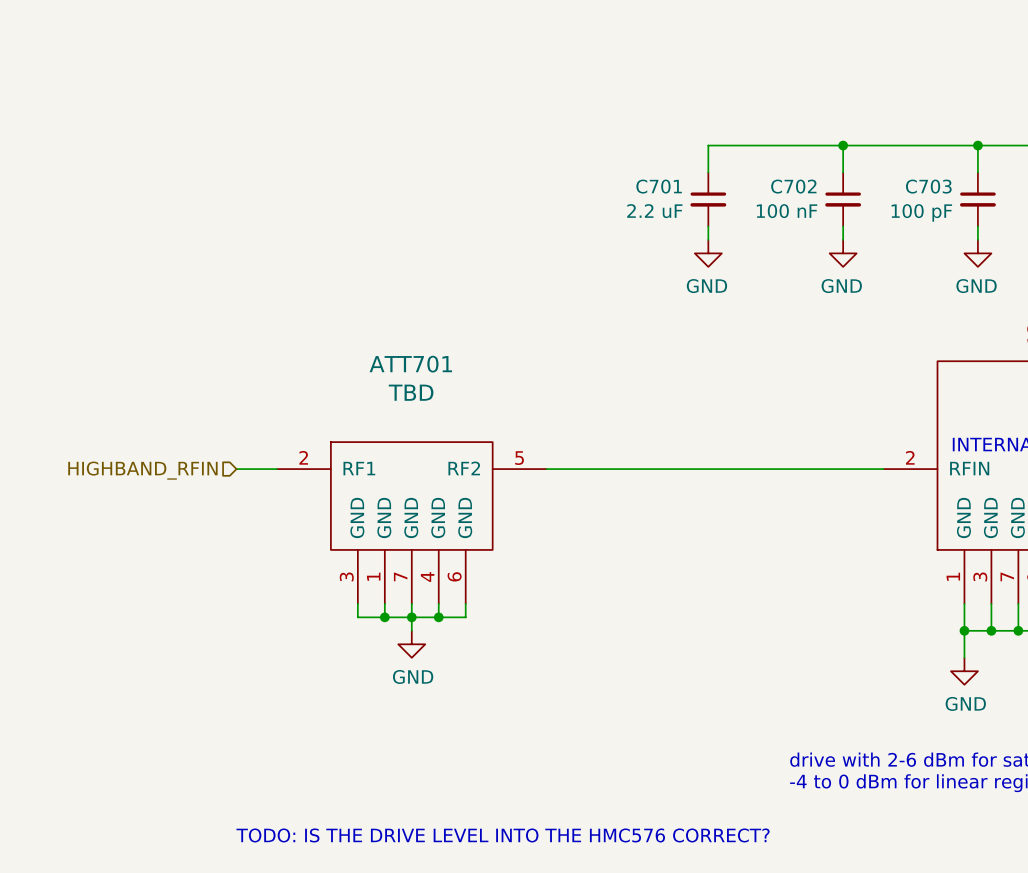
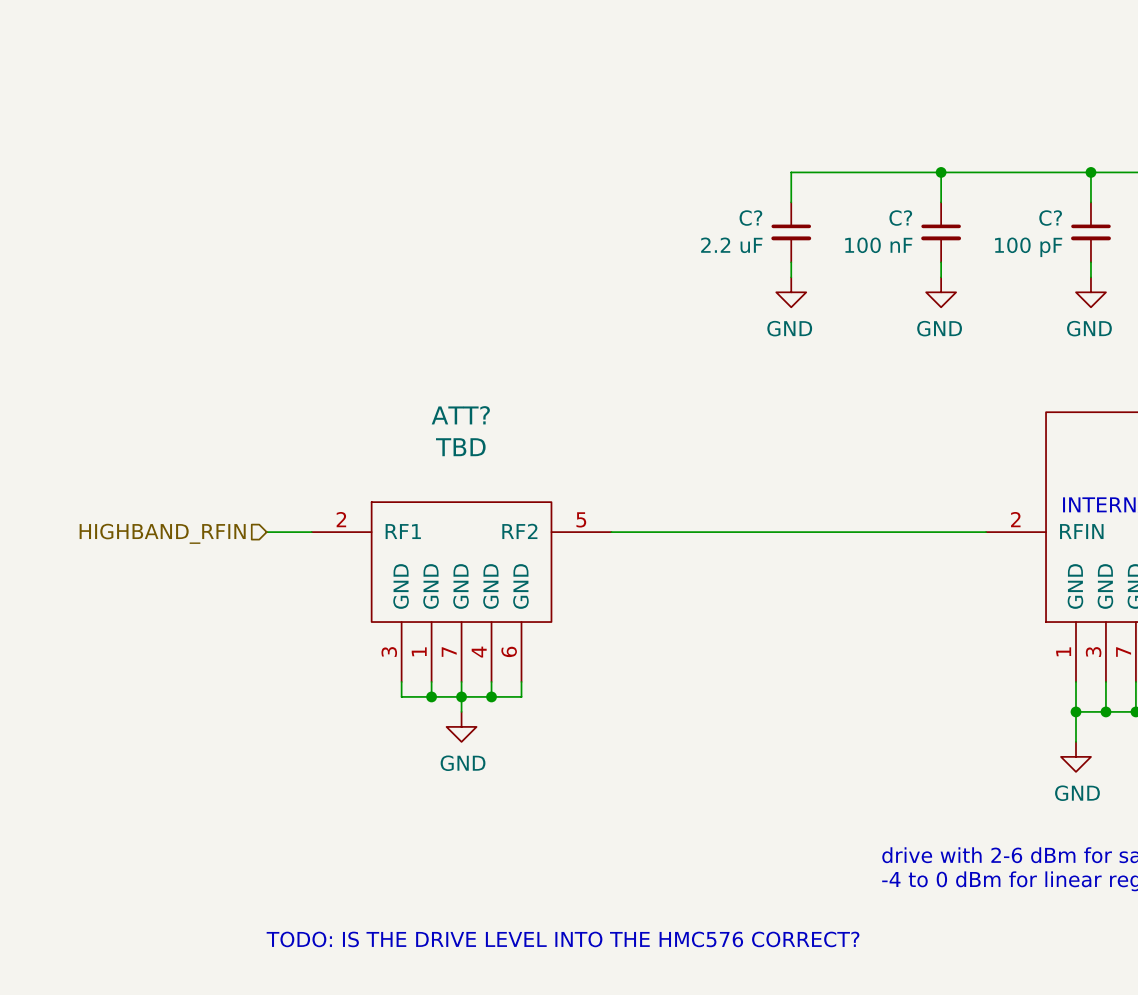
C701 name: C701 (659, 186) -> C? (750, 218)
C702 name: C702 (793, 186) -> C? (900, 218)
C703 name: C703 (928, 186) -> C? (1050, 218)
ATT701 name: ATT701 (410, 364) -> ATT? (460, 415)

